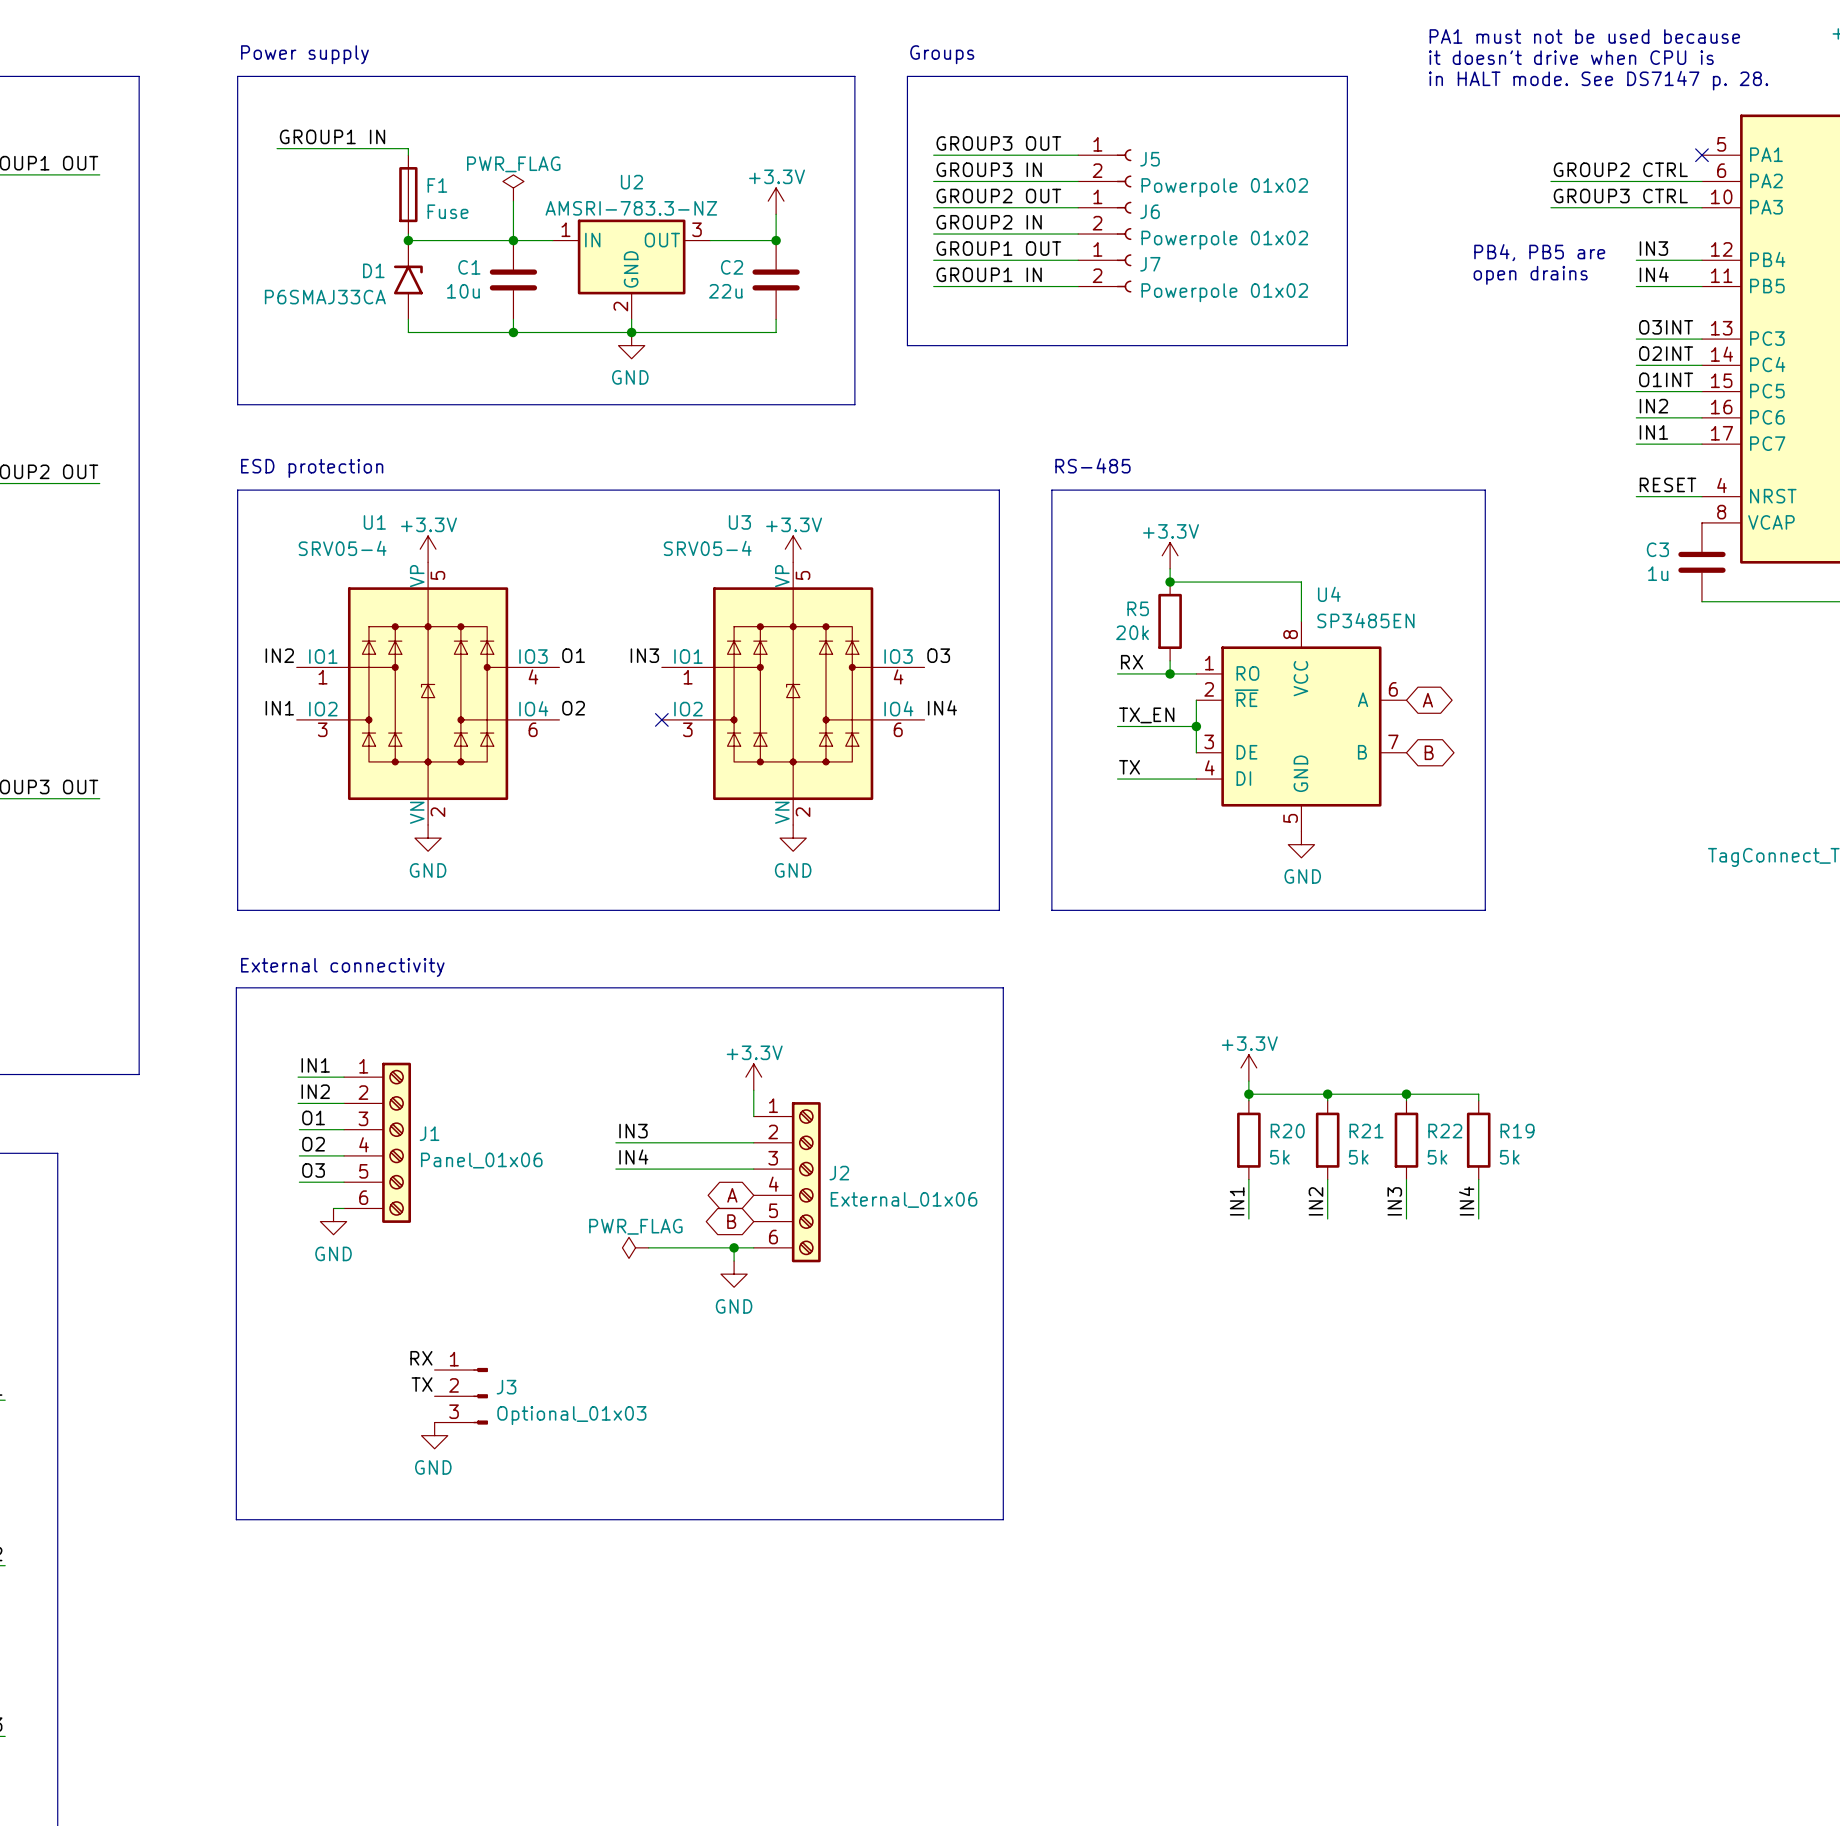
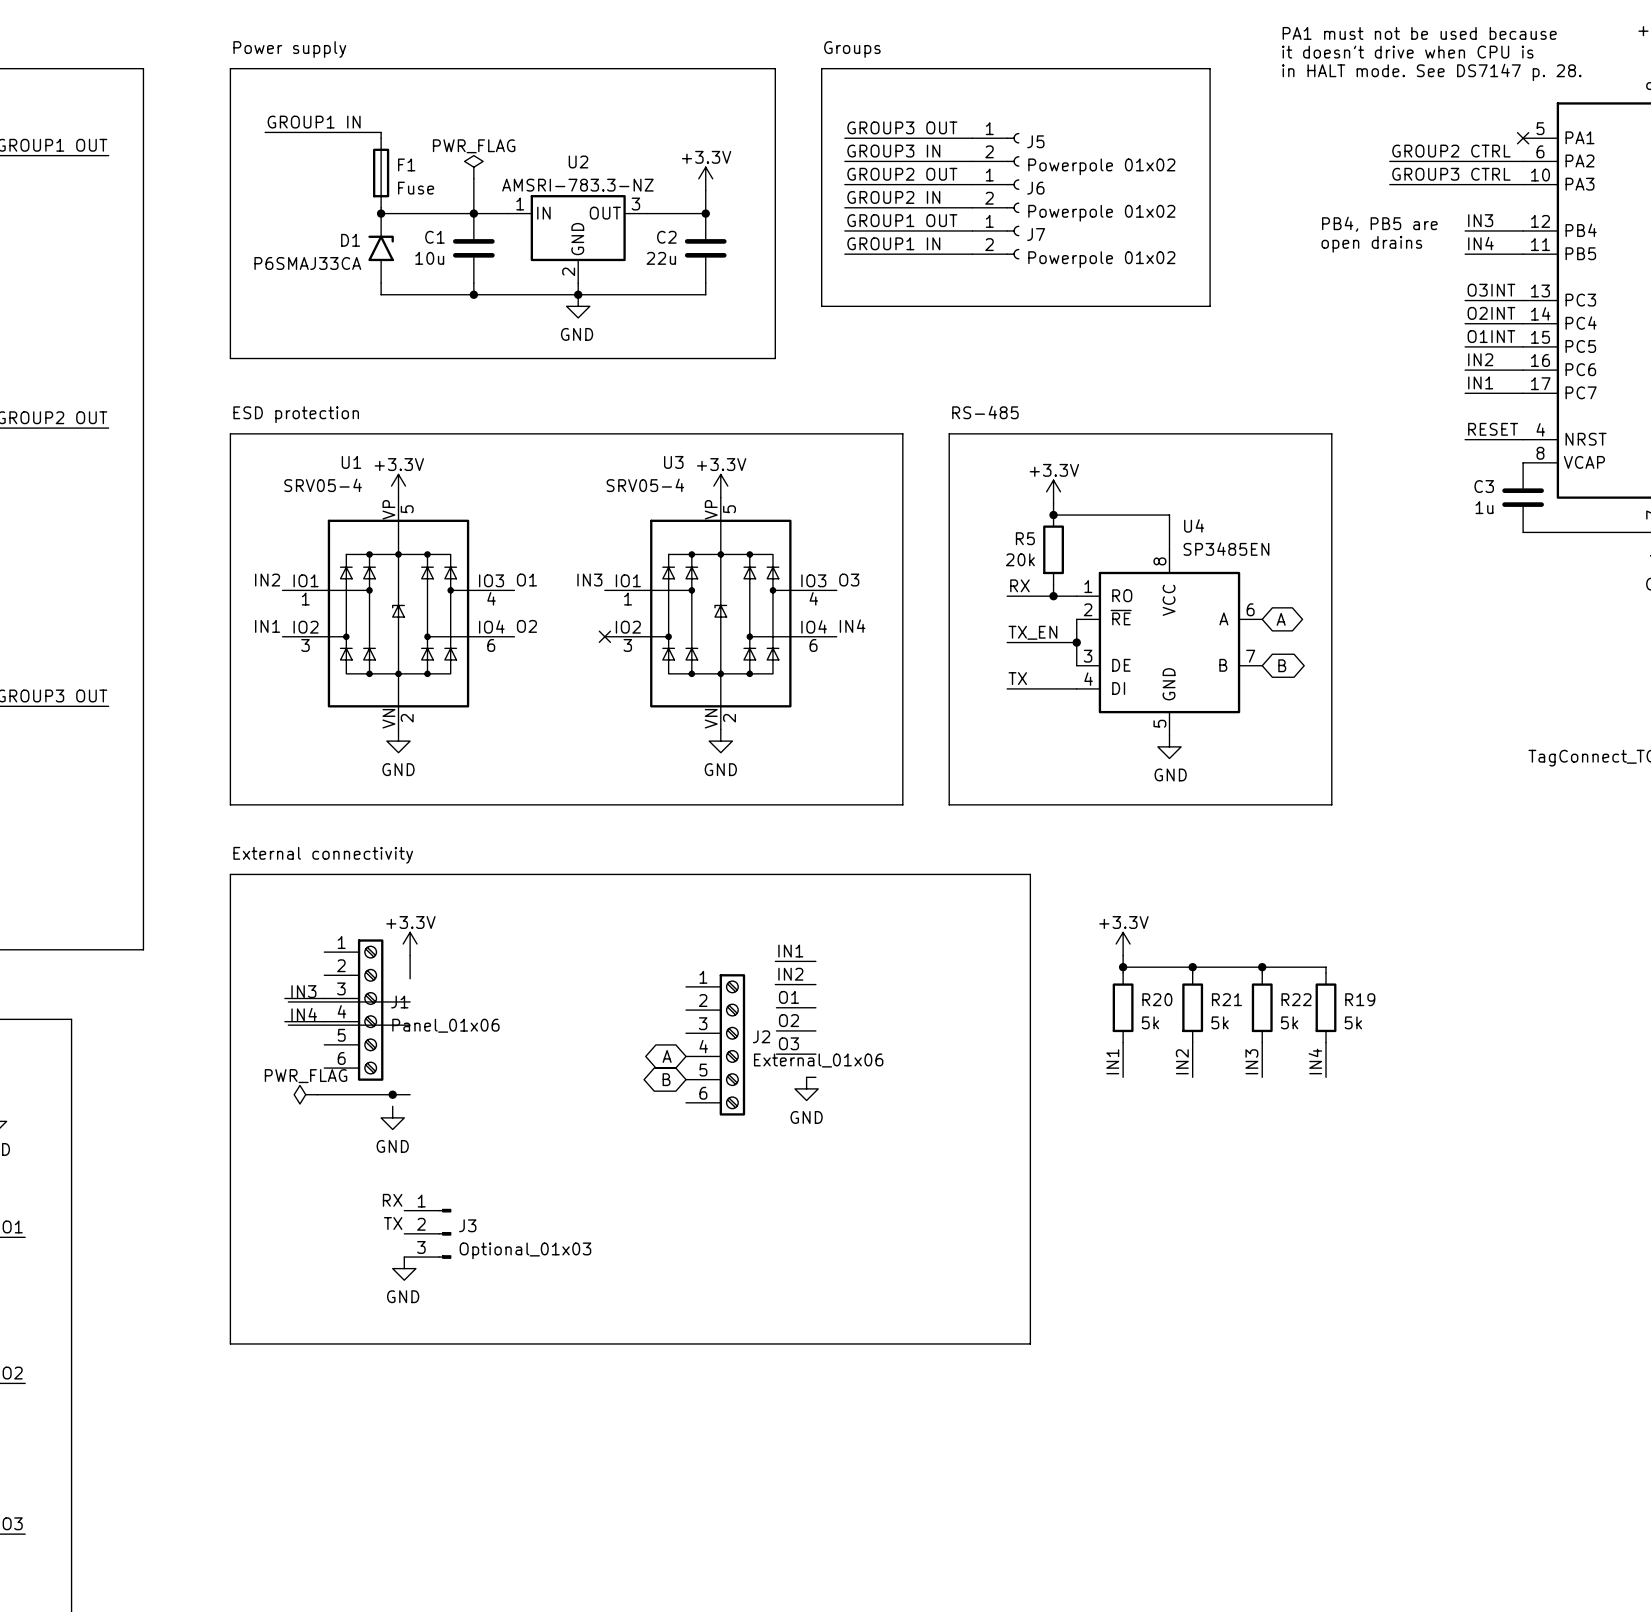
line: (236, 987) (236, 1519) (1003, 1519) (1003, 987) (236, 987) -> (230, 874) (230, 1343) (1030, 1343) (1030, 874) (230, 874)
label: IN1 (315, 1065) -> none
power symbol: none -> +3.3V (410, 943)
label: none -> IN1 (790, 951)
wire: (298, 1077) (344, 1077) -> none
power symbol: +3.3V (753, 1077) -> none
wire: none -> (410, 955) (410, 978)
wire: none -> (775, 961) (815, 961)
wire: (753, 1090) (753, 1116) -> none
label: IN2 (315, 1091) -> none
label: none -> IN2 (790, 974)
wire: (298, 1103) (344, 1103) -> none
wire: none -> (775, 984) (815, 984)
label: O1 (313, 1117) -> IN3 (303, 991)
label: none -> O1 (788, 997)
label: IN3 (633, 1131) -> none
wire: none -> (288, 1001) (410, 1001)
wire: none -> (776, 1007) (815, 1007)
wire: (615, 1142) (753, 1142) -> none
label: O2 (313, 1144) -> IN4 (304, 1014)
label: none -> O2 (788, 1020)
label: IN4 (633, 1157) -> none
wire: none -> (288, 1025) (410, 1025)
wire: none -> (776, 1030) (815, 1030)
wire: (615, 1169) (753, 1169) -> none
label: O3 (313, 1170) -> none
label: none -> O3 (788, 1043)
wire: (299, 1182) (344, 1182) -> none
wire: none -> (776, 1054) (815, 1054)
wire: (333, 1208) (344, 1208) -> none
wire: none -> (806, 1077) (815, 1077)
power symbol position: GND (333, 1221) -> GND (392, 1117)
power symbol: none -> GND (806, 1088)
power symbol: none -> PWR_FLAG (305, 1094)
wire: none -> (317, 1094) (410, 1094)
junction: none -> (392, 1094)
power symbol: PWR_FLAG (635, 1247) -> none
wire: (648, 1247) (753, 1247) -> none
wire: (734, 1247) (734, 1261) -> none
junction: (734, 1247) -> none
power symbol: GND (734, 1274) -> none

